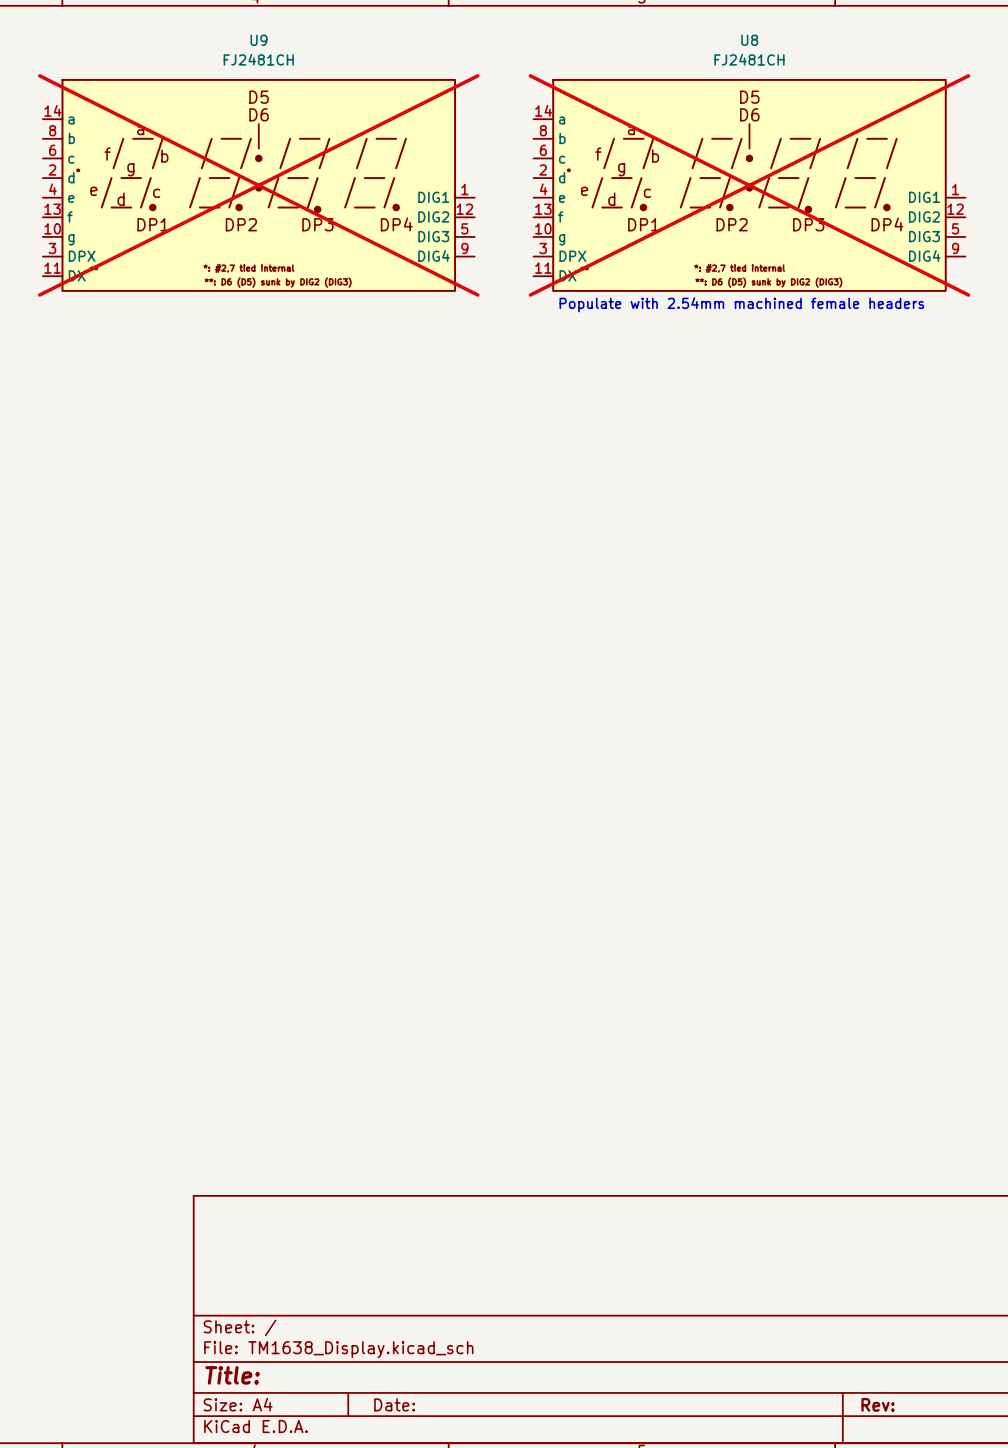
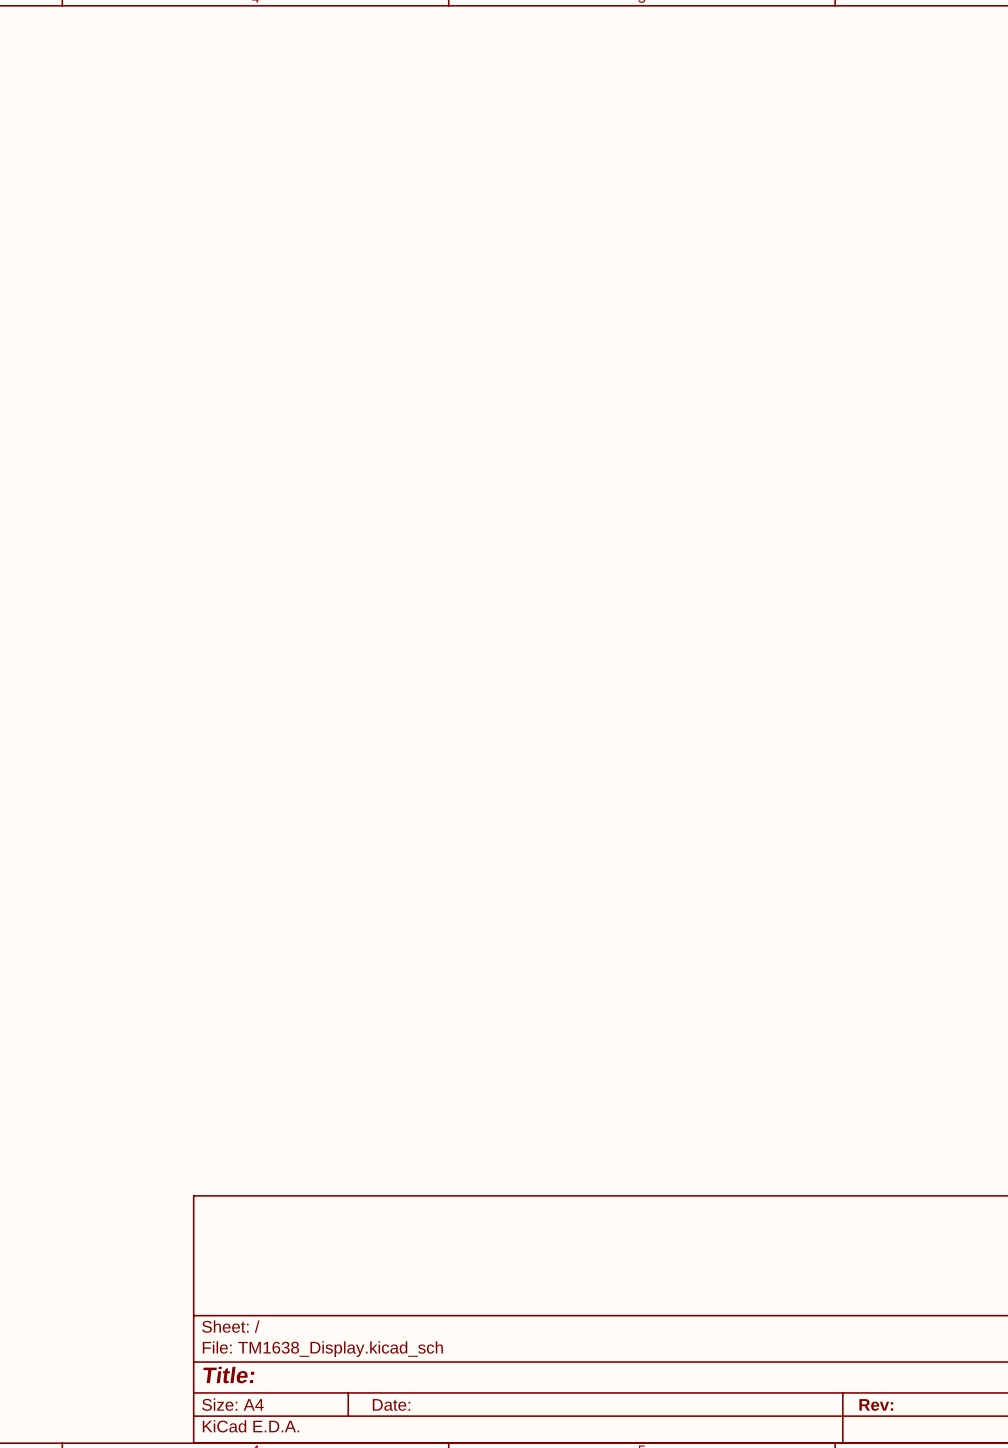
U9: FJ2481CH (258, 185) -> none
U8: FJ2481CH (749, 185) -> none
text: Populate with 2.54mm machined female headers (741, 304) -> none

